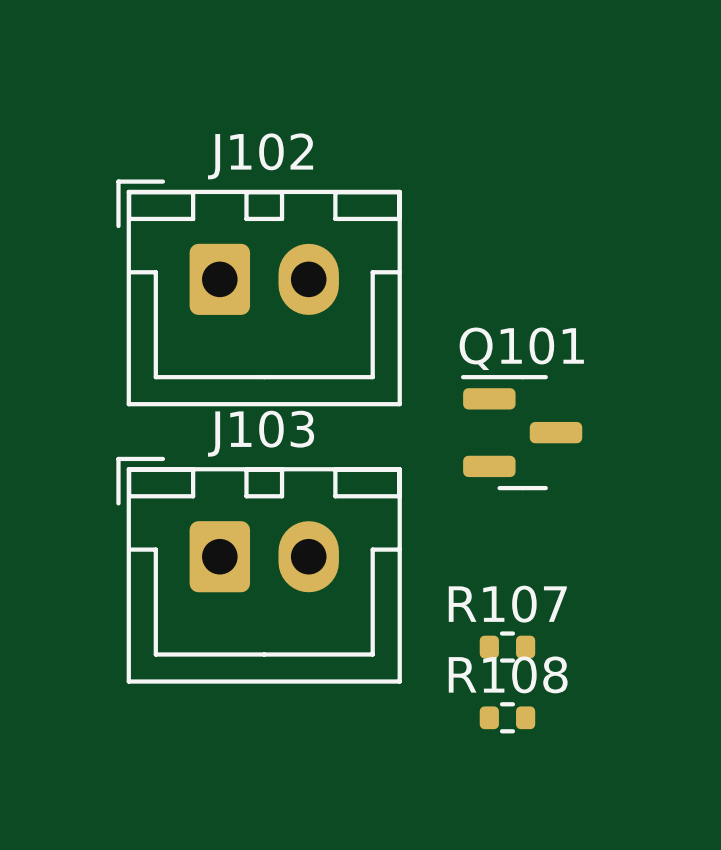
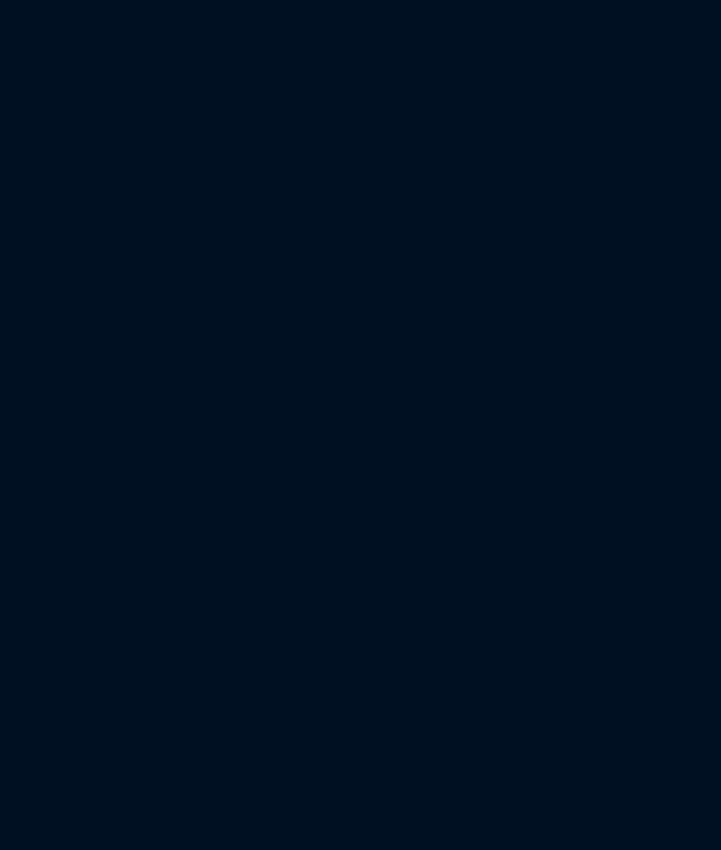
J102: (259, 292) -> none
Q101: (521, 432) -> none
J103: (259, 570) -> none
R107: (507, 647) -> none
R108: (507, 717) -> none

